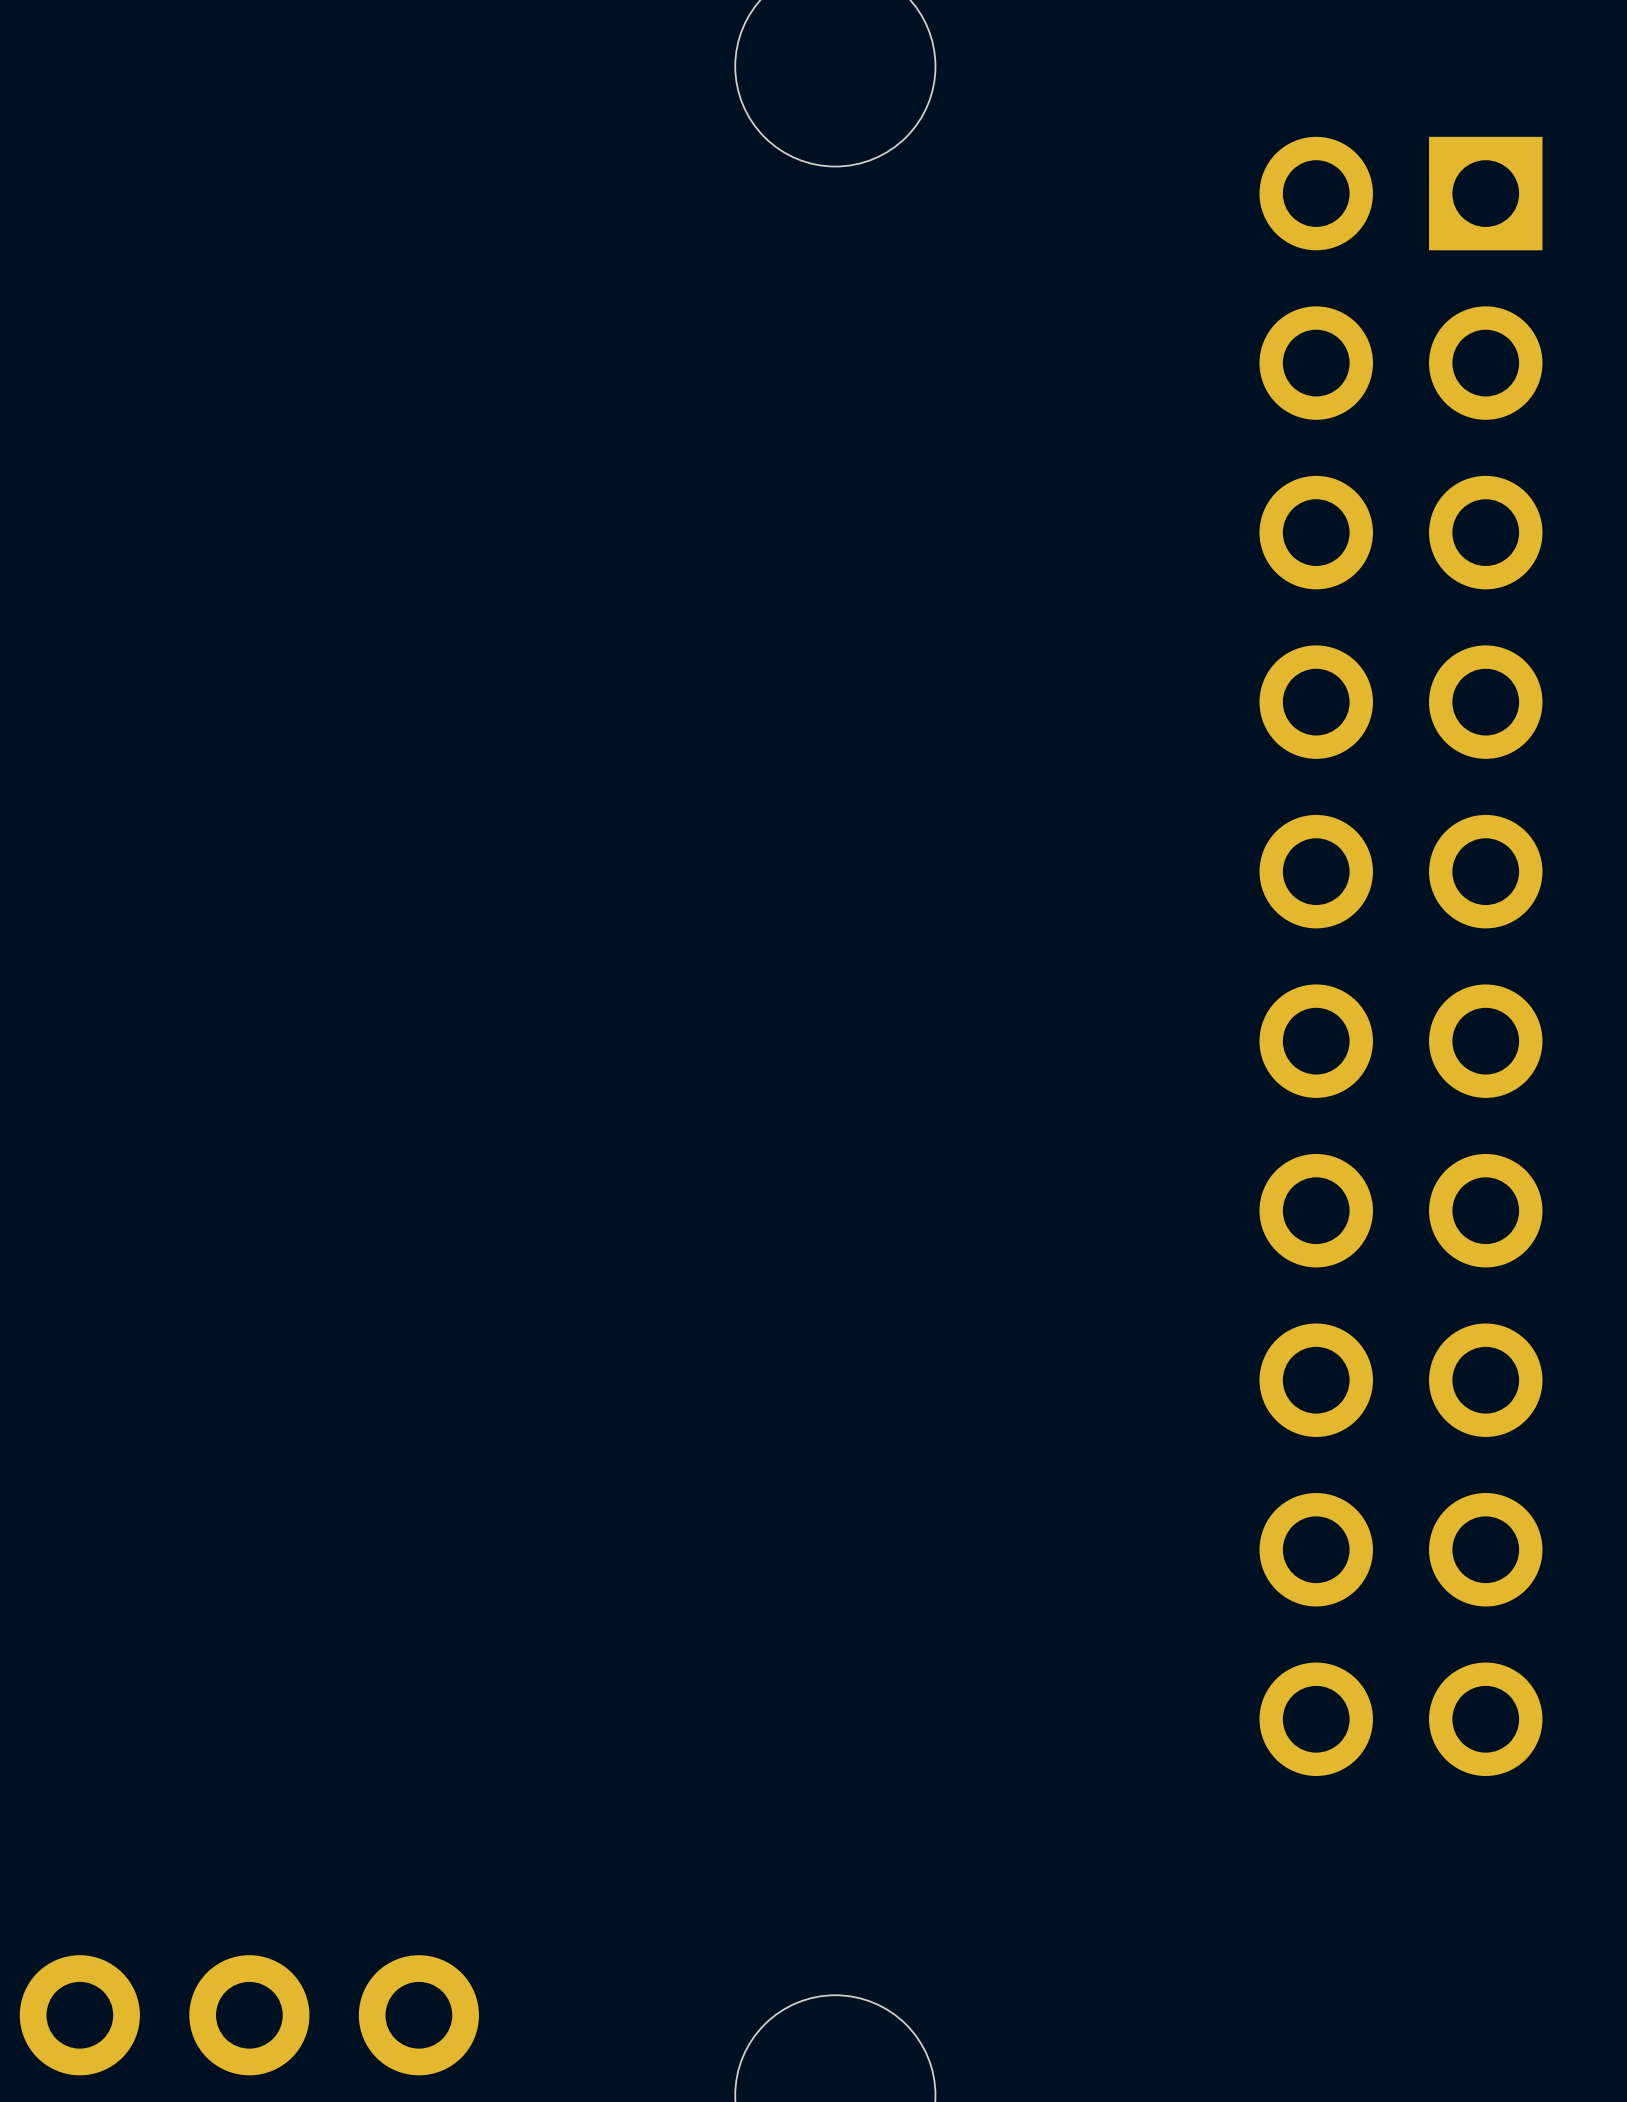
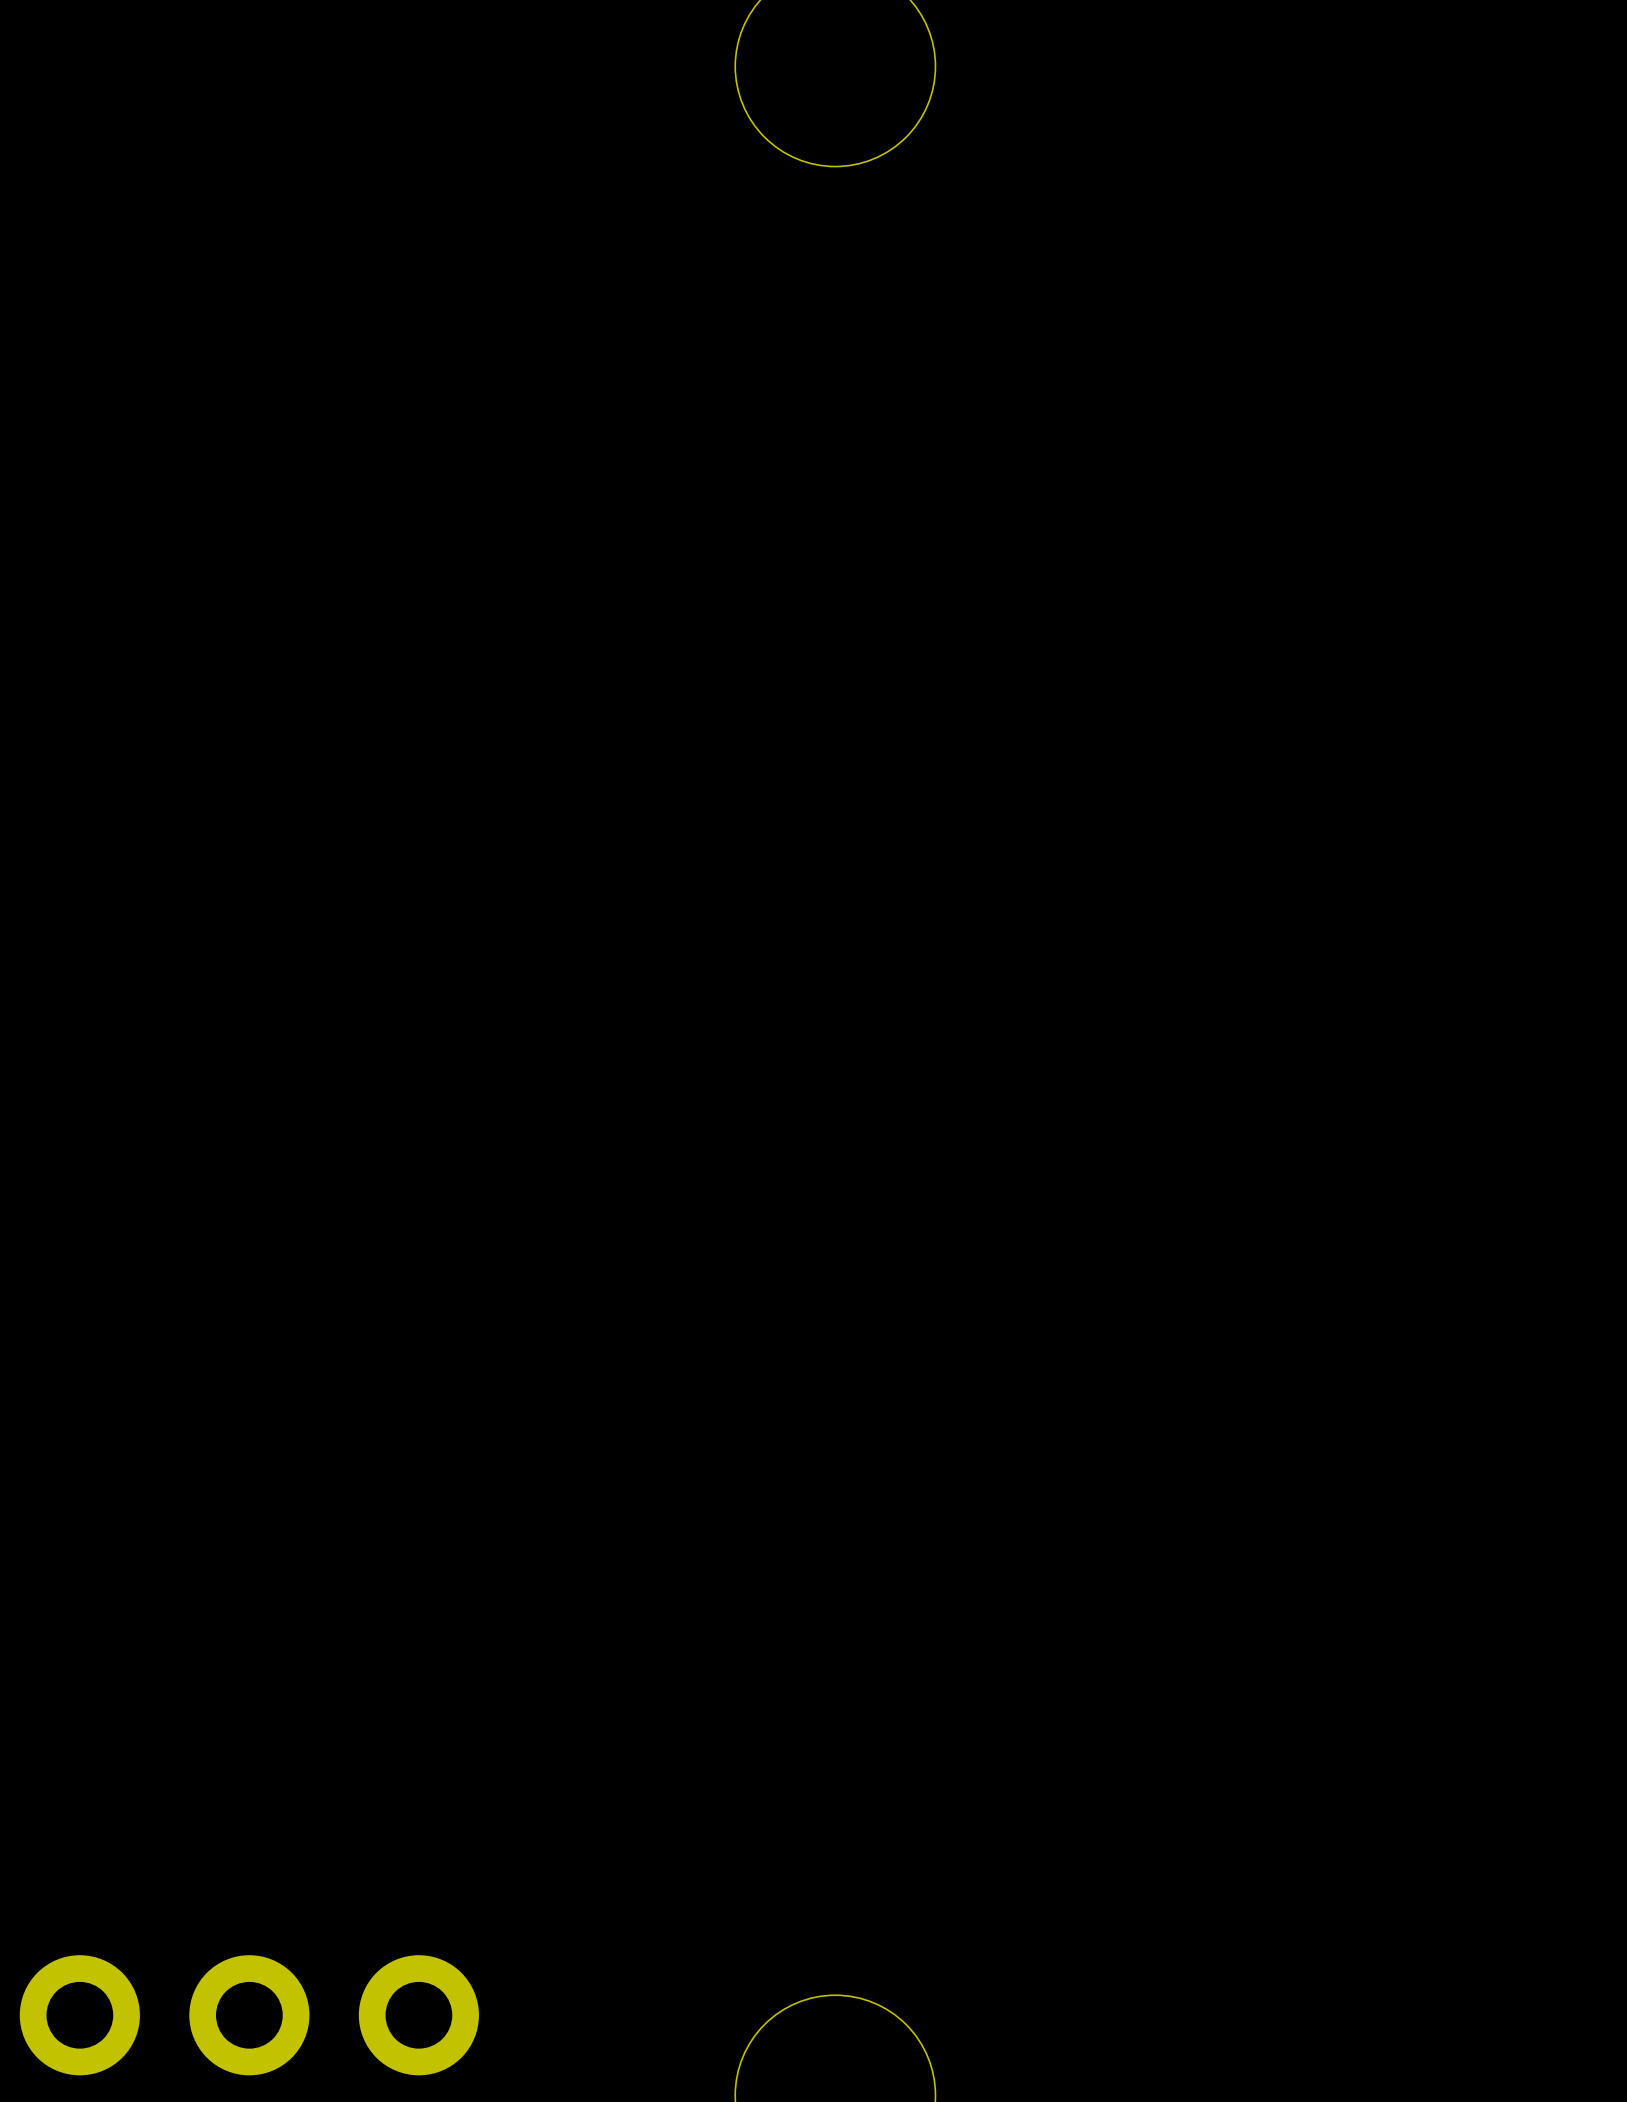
part: (1400, 956) -> none

